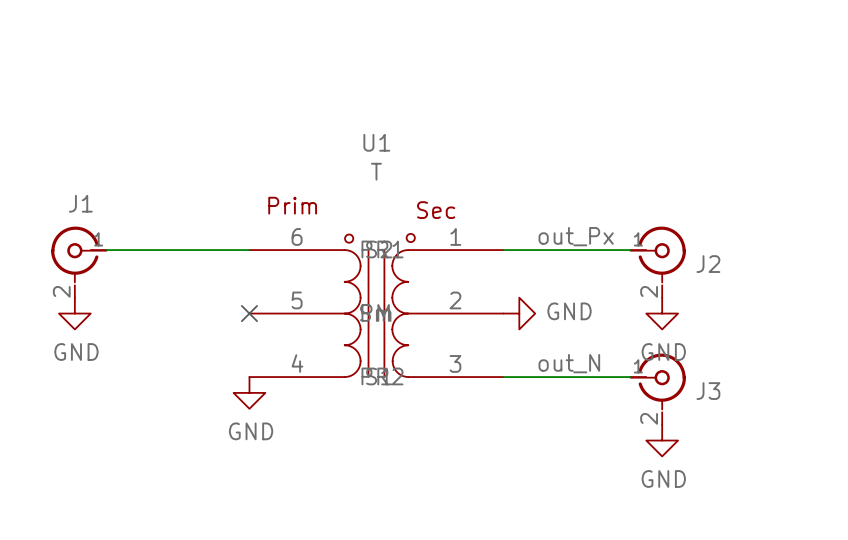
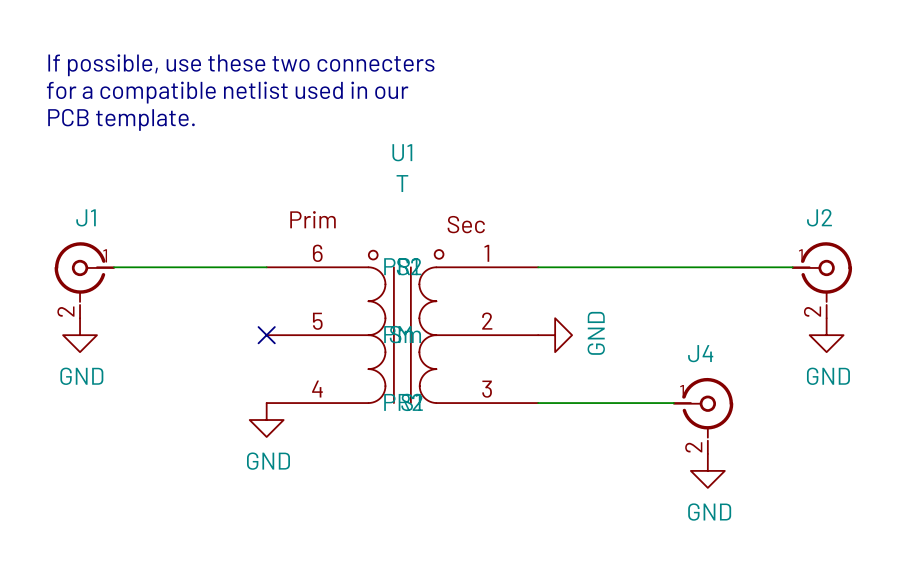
text: none -> If possible, use these two connecters (241, 65)
text: none -> for a compatible netlist used in our (227, 92)
text: none -> PCB template. (121, 119)
label: out_Px (576, 236) -> none
wire: none -> (673, 267) (792, 267)
J2 position: (658, 262) -> (822, 280)
J2 name position: J2 (708, 264) -> J2 (819, 217)
power symbol text rotation: 0° (569, 311) -> 90° counterclockwise (596, 333)
power symbol position: GND (662, 313) -> GND (826, 335)
label: out_N (569, 363) -> none
J3 name: J3 (708, 391) -> J4 (700, 353)

